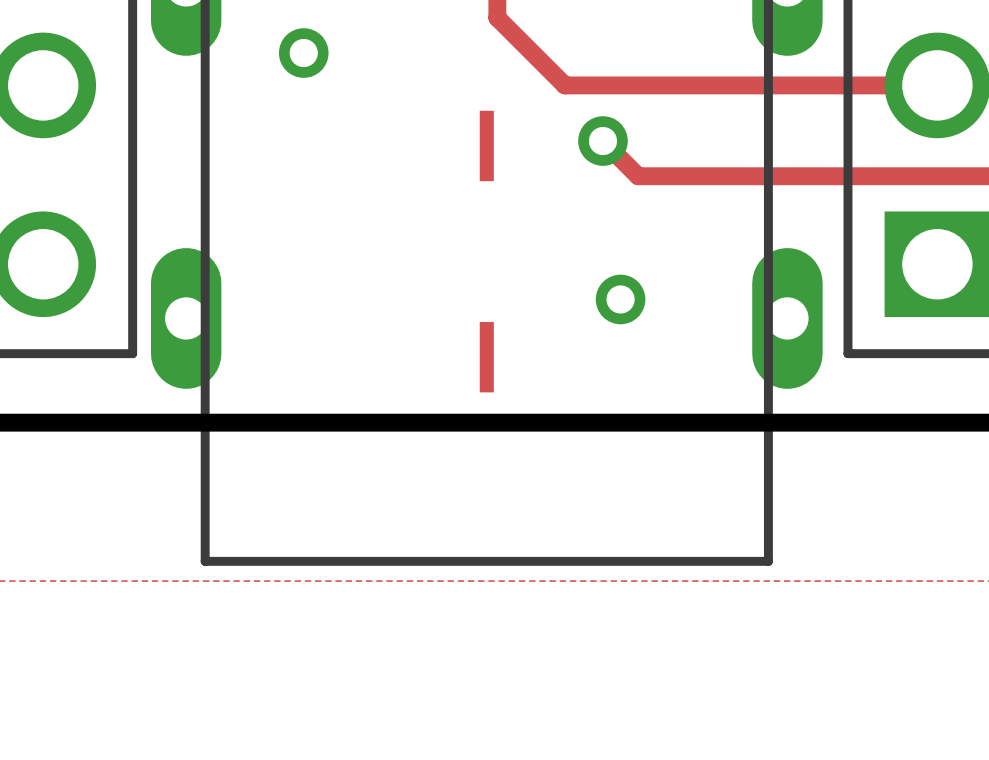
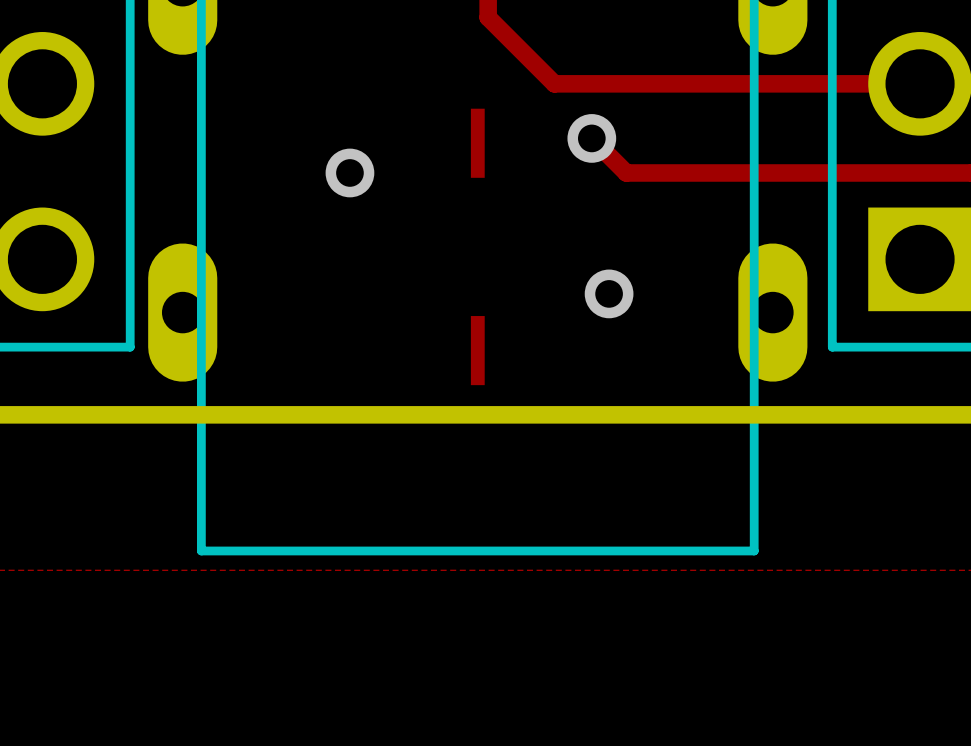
via position: (303, 53) -> (349, 172)

